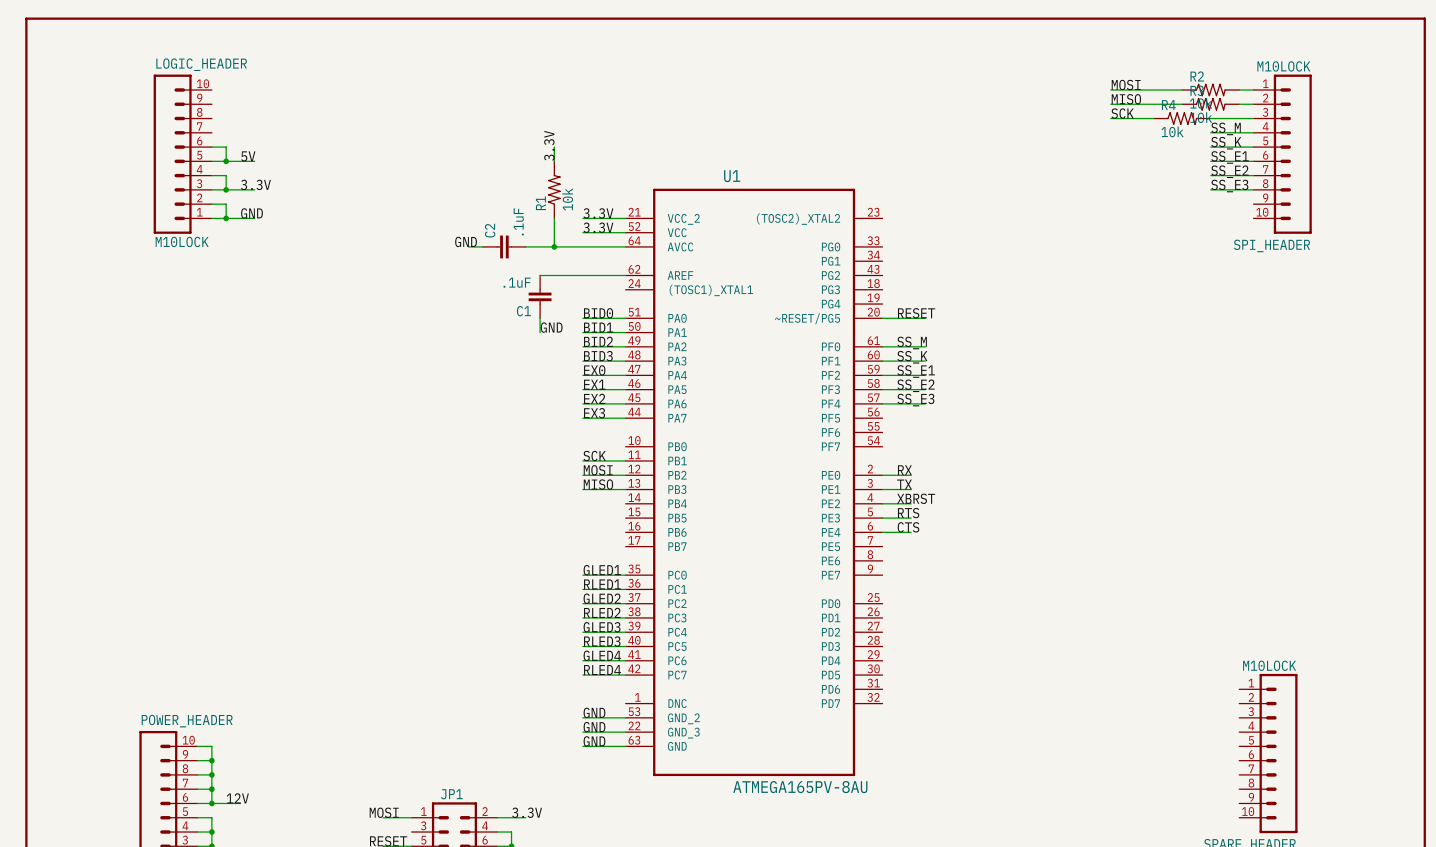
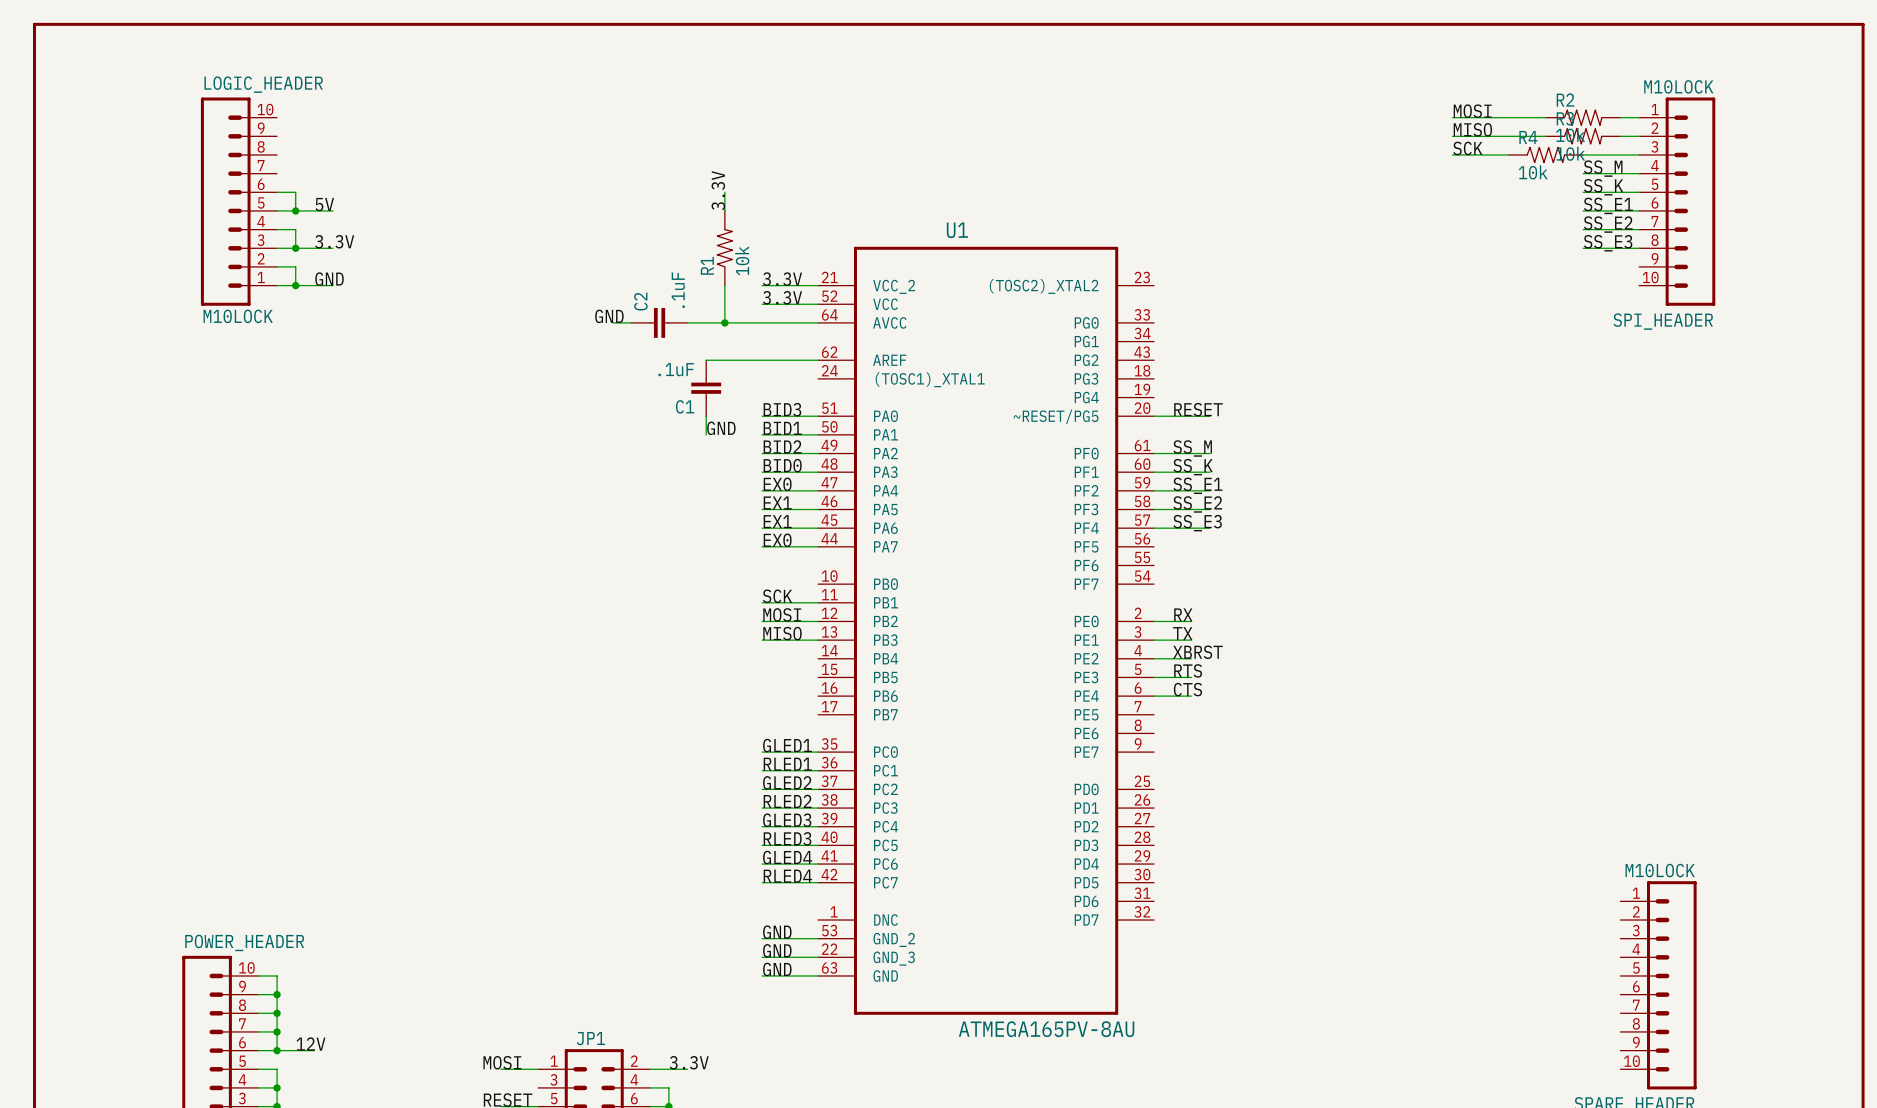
label: BID0 (598, 313) -> BID3 (782, 409)
label: BID3 (598, 356) -> BID0 (782, 465)
label: EX2 (594, 398) -> EX1 (777, 521)
label: EX3 (594, 413) -> EX0 (777, 540)

